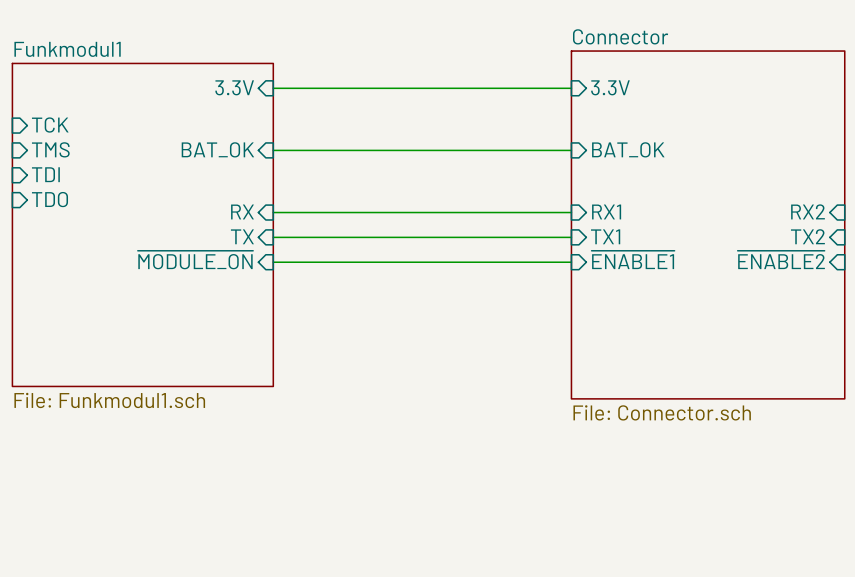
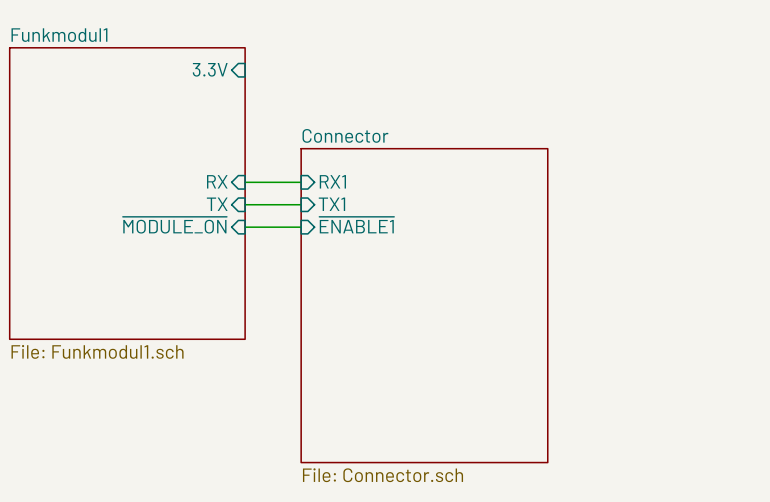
sheet pin: 3.3V (610, 87) -> none
wire: (273, 88) (571, 88) -> none
sheet pin: TCK (50, 125) -> none
sheet pin: TMS (50, 149) -> none
sheet pin: BAT_OK (217, 149) -> none
sheet pin: BAT_OK (628, 149) -> none
wire: (273, 150) (571, 150) -> none
sheet pin: TDI (45, 174) -> none
sheet pin: TDO (49, 199) -> none
sheet pin position: RX1 (606, 211) -> RX1 (332, 181)
sheet pin: RX2 (808, 211) -> none
wire: (335, 212) (571, 212) -> none
sheet Connector: File: Connector.sch (708, 224) -> none
sheet pin position: TX1 (605, 236) -> TX1 (331, 204)
sheet pin: TX2 (807, 236) -> none
wire: (335, 237) (571, 237) -> none
sheet pin position: ~{ENABLE1} (633, 259) -> ~{ENABLE1} (356, 225)
sheet pin: ~{ENABLE2} (781, 259) -> none
wire: (335, 262) (571, 262) -> none
sheet Connector: none -> File: Connector.sch (424, 305)

